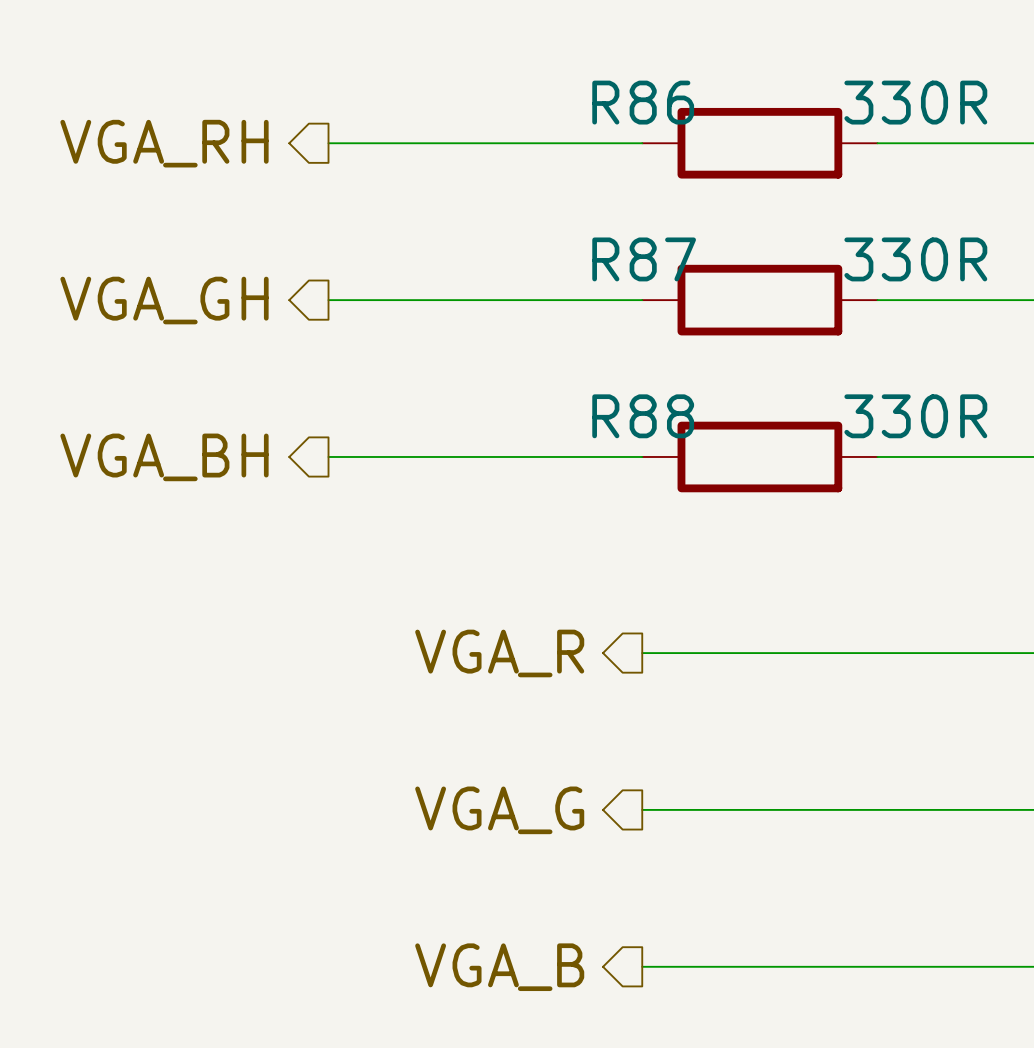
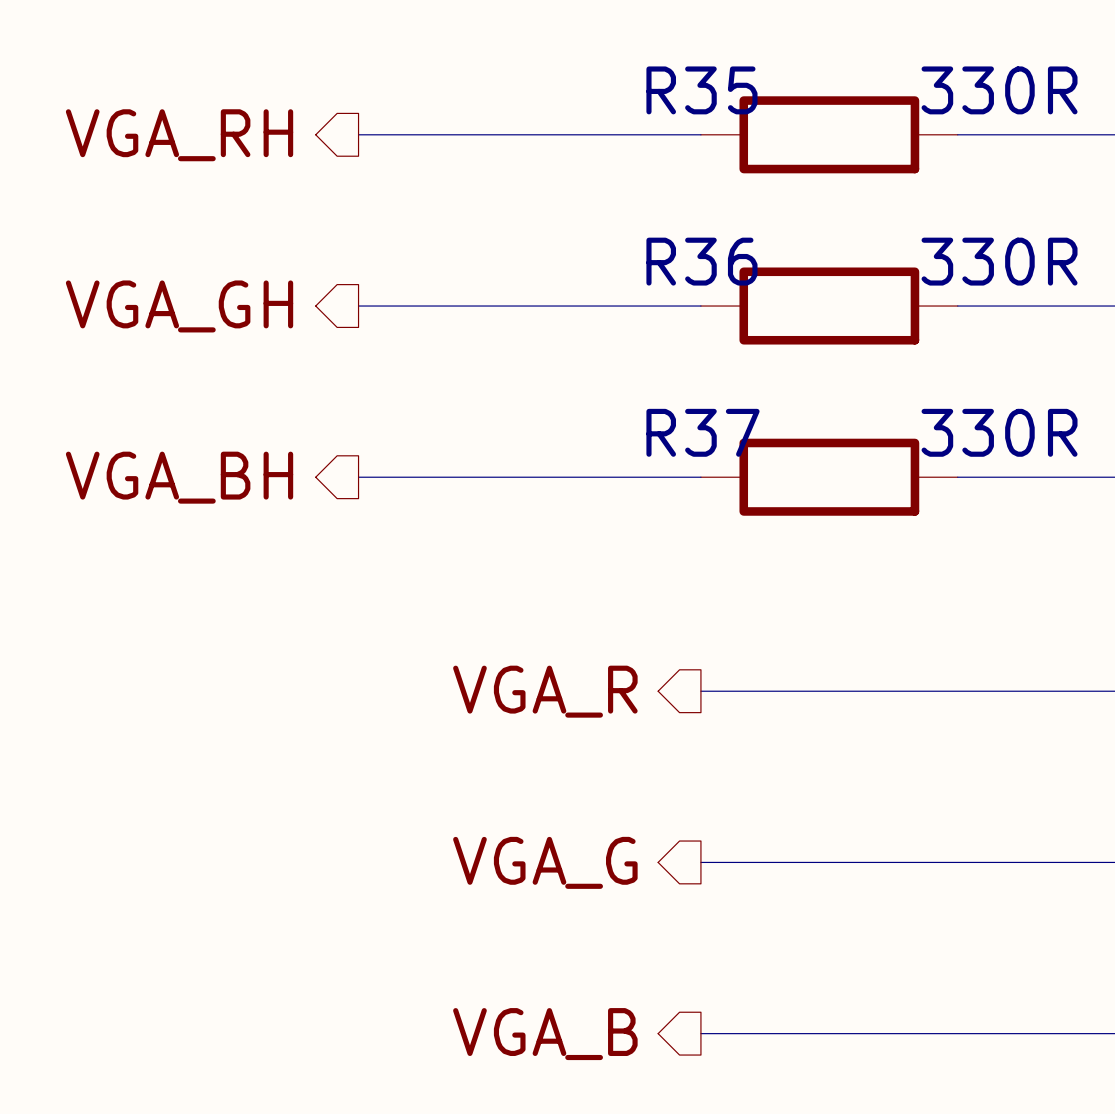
R86 name: R86 (643, 102) -> R35 (701, 90)
R87 name: R87 (644, 259) -> R36 (701, 261)
R88 name: R88 (643, 416) -> R37 (702, 432)

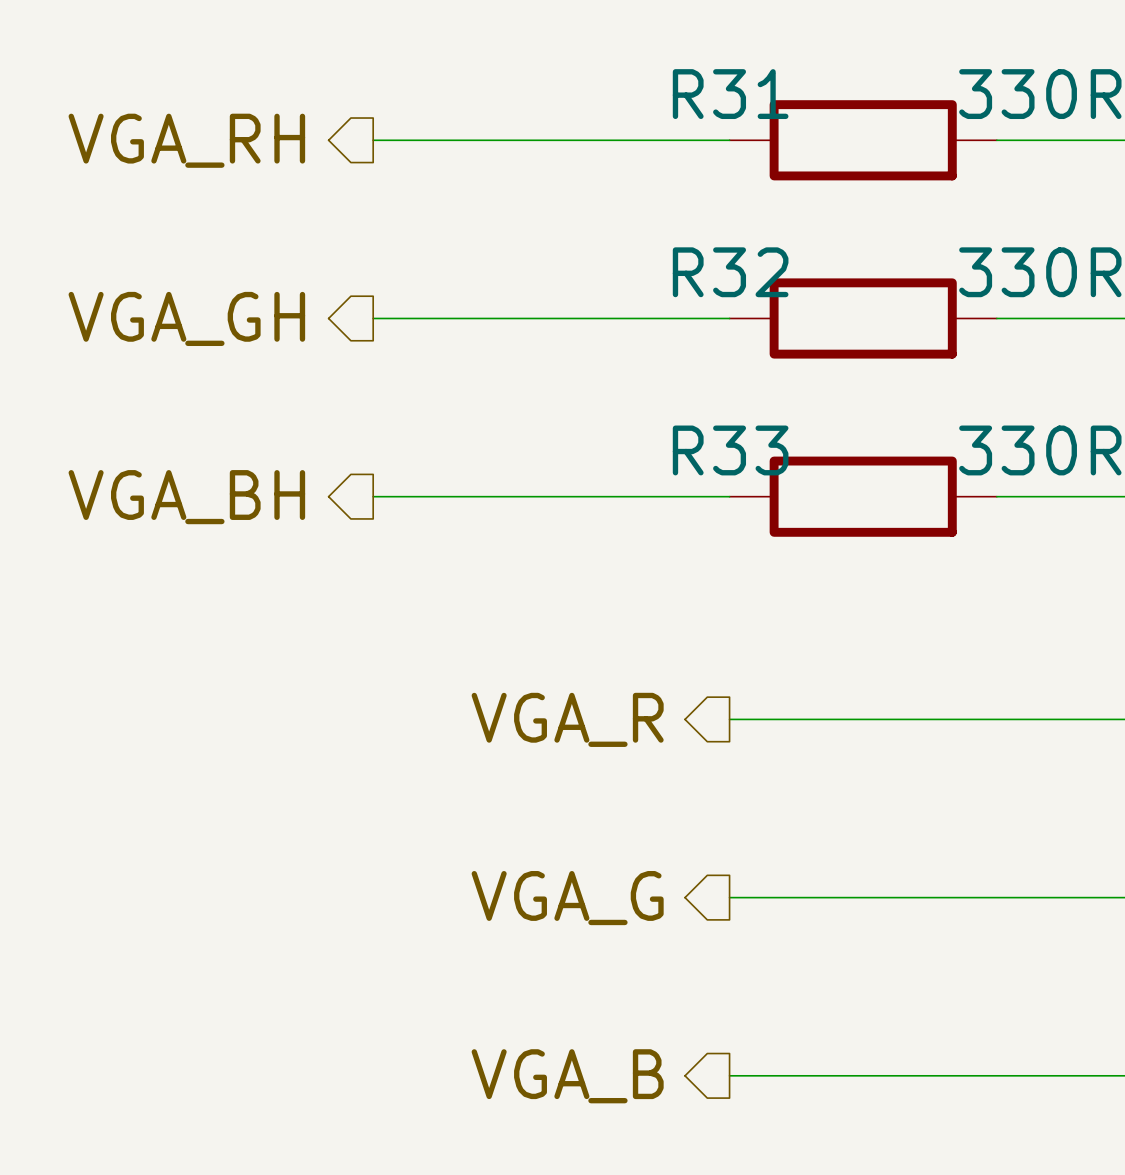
R35 name: R35 (701, 90) -> R31 (730, 94)
R36 name: R36 (701, 261) -> R32 (730, 272)
R37 name: R37 (702, 432) -> R33 (730, 450)

